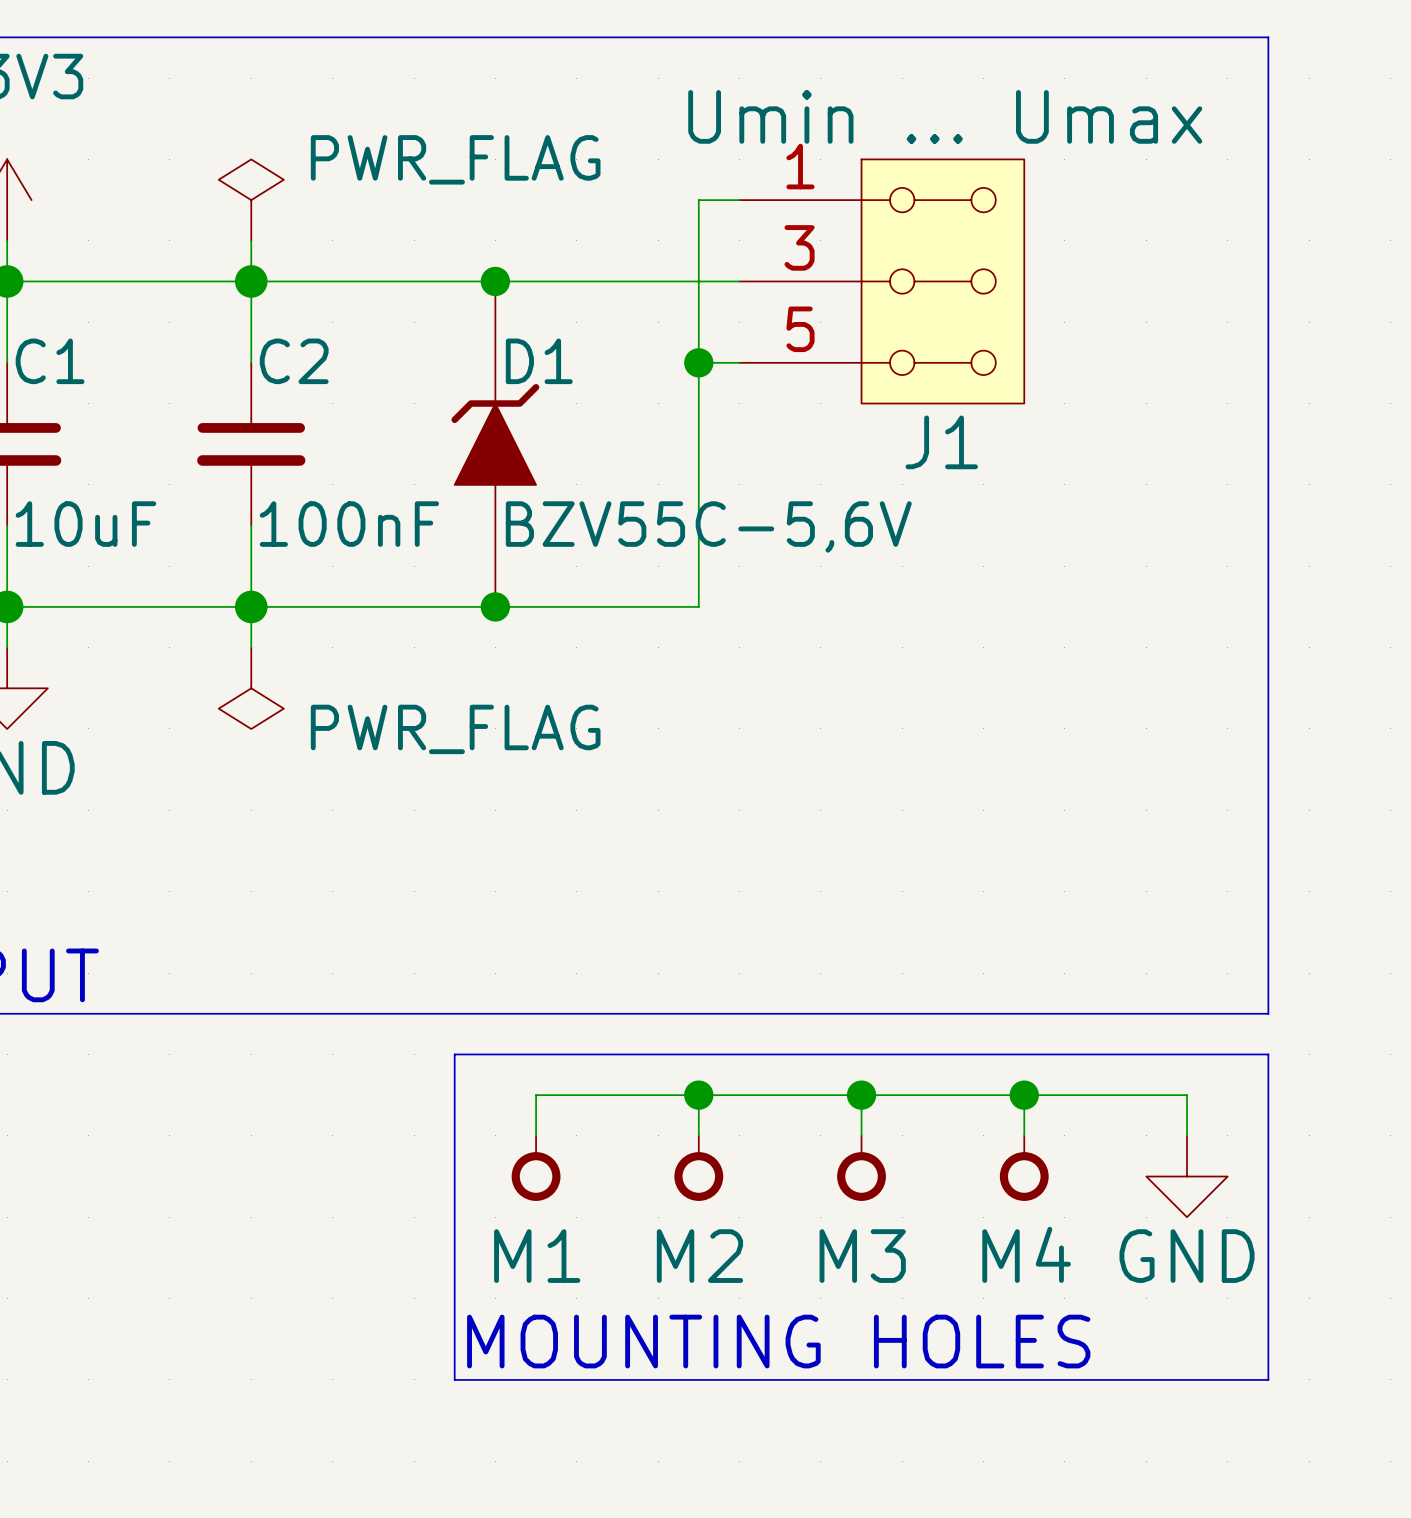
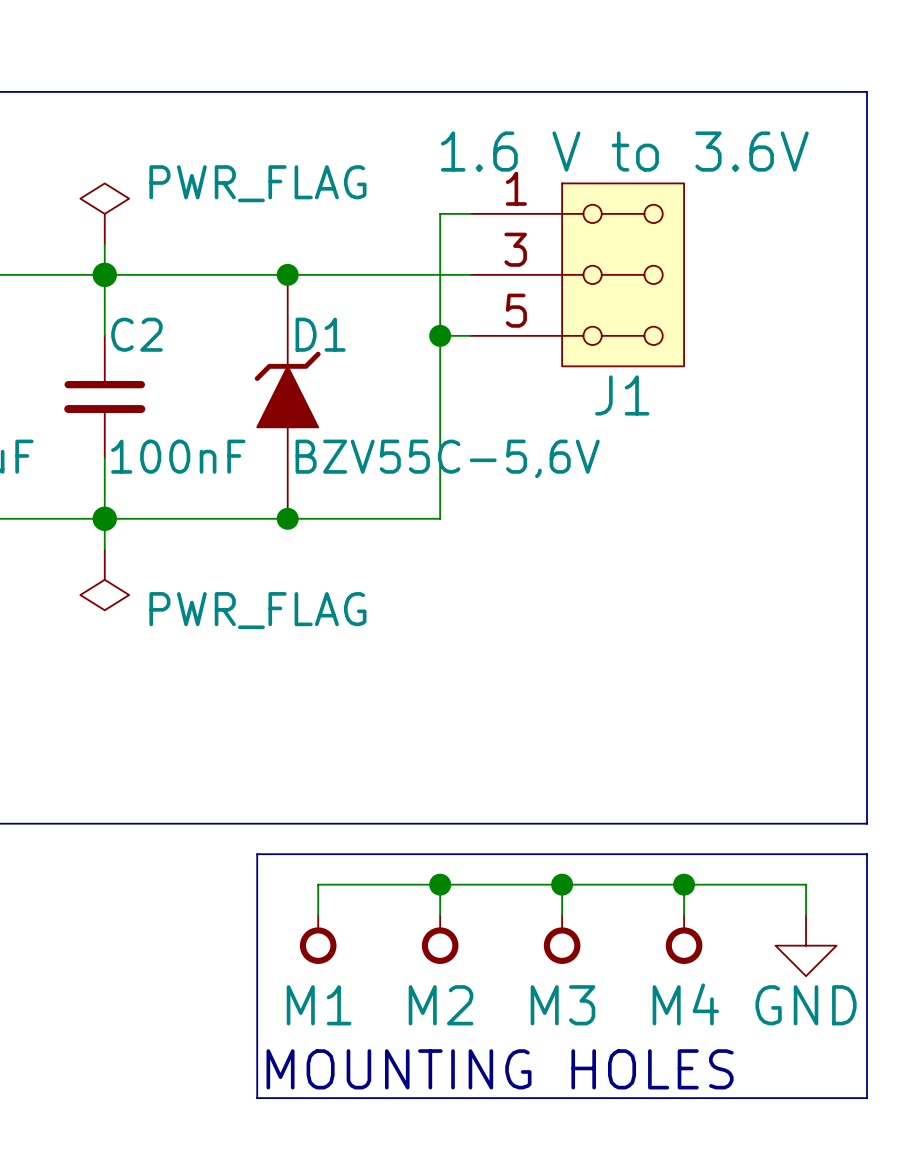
J1 value: Umin ... Umax (945, 116) -> 1.6 V to 3.6V (624, 151)

